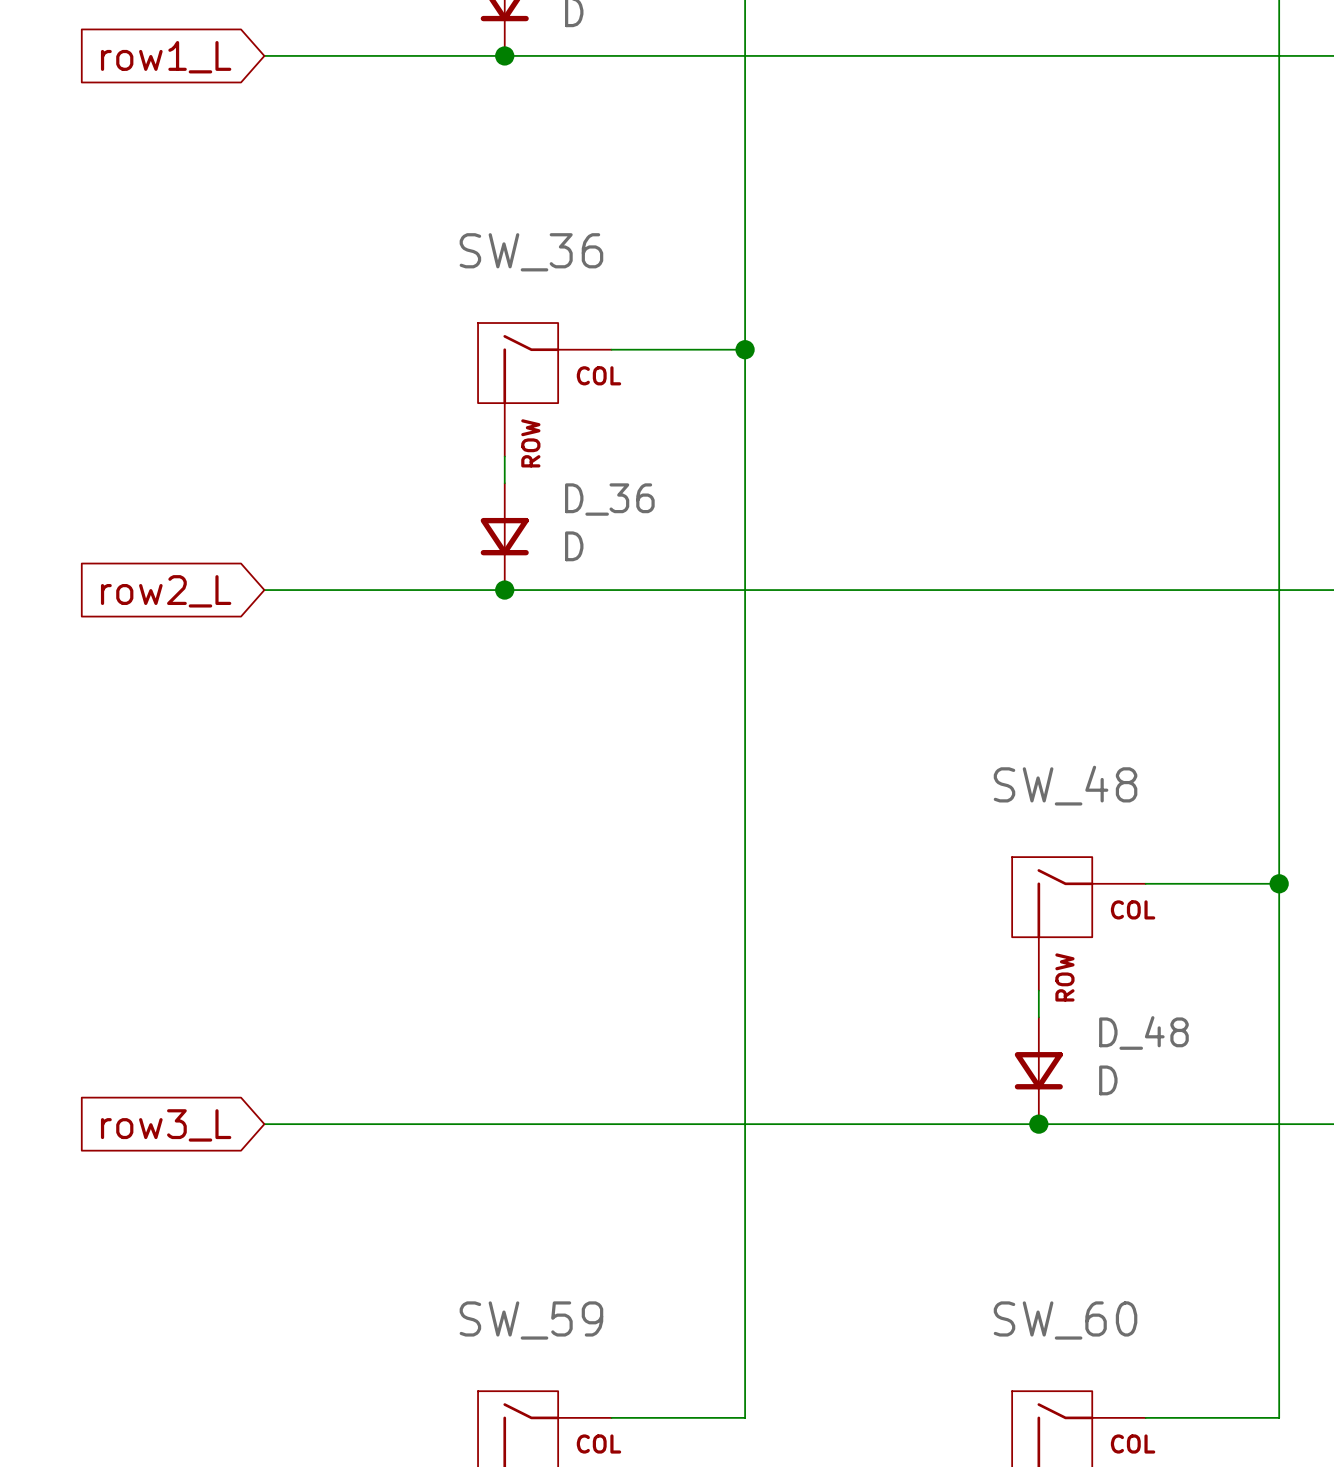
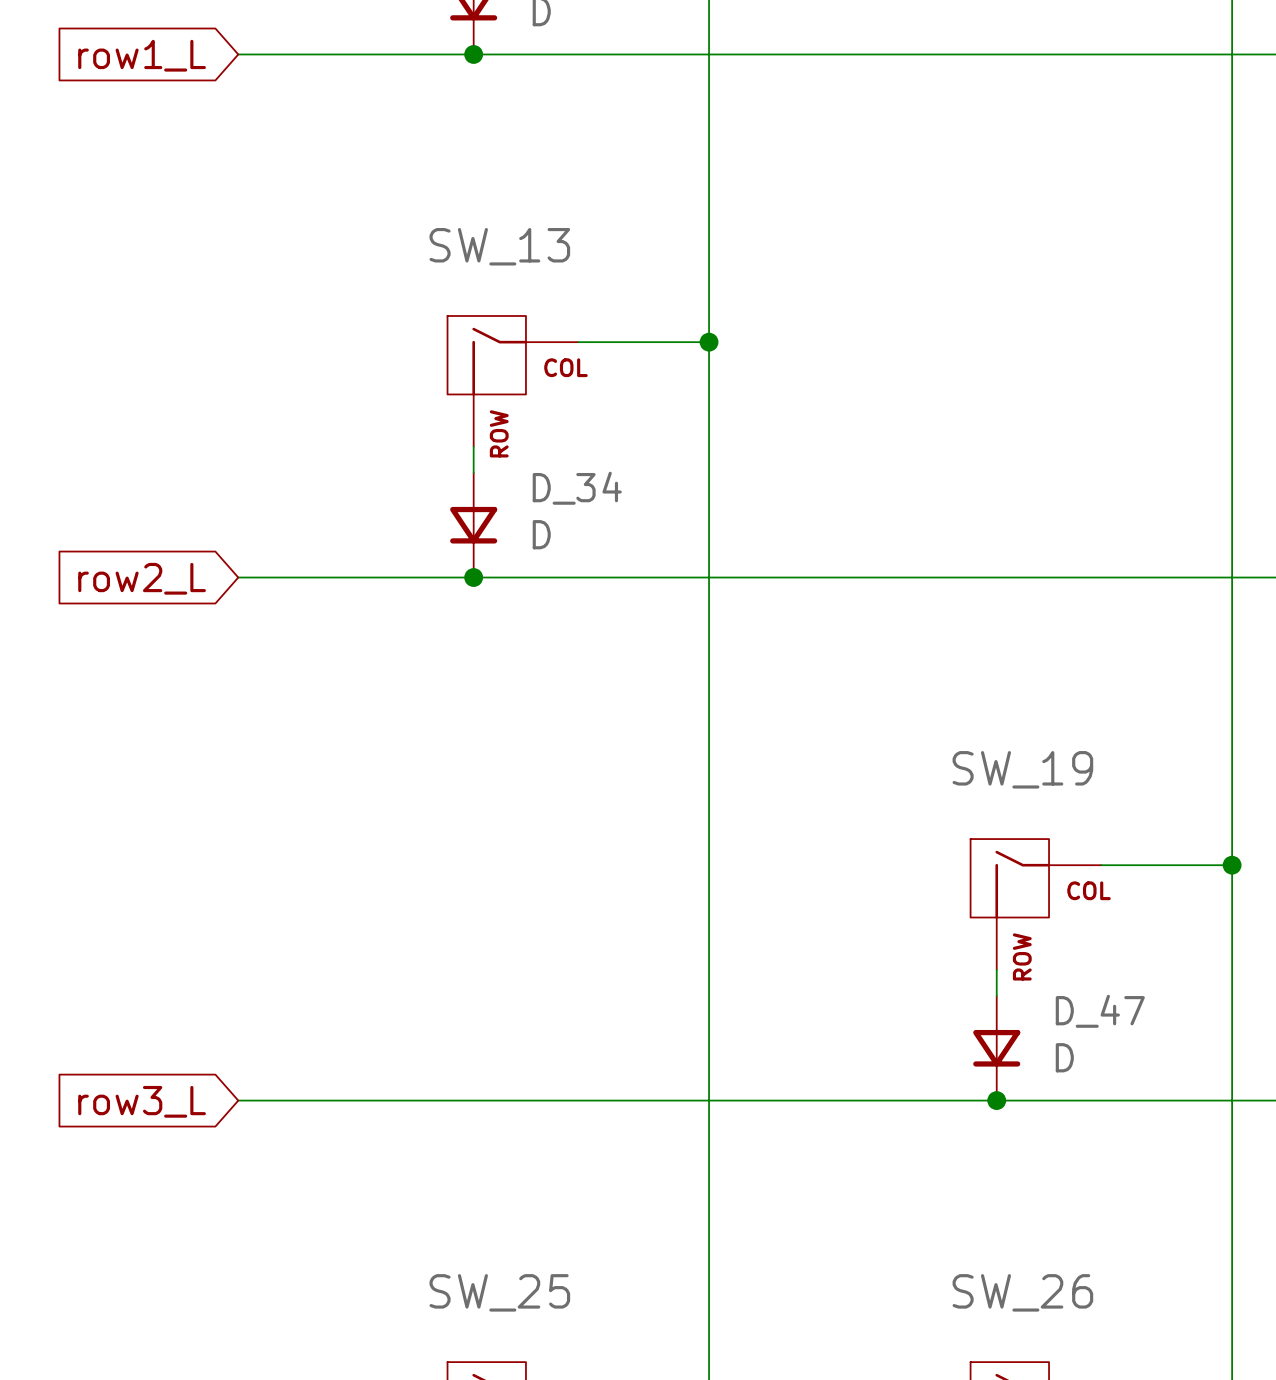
SW_36 name: SW_36 (531, 252) -> SW_13 (499, 246)
D_36 name: D_36 (609, 499) -> D_34 (577, 488)
SW_48 name: SW_48 (1065, 785) -> SW_19 (1022, 769)
D_48 name: D_48 (1143, 1032) -> D_47 (1100, 1011)
SW_59 name: SW_59 (531, 1320) -> SW_25 (499, 1292)
SW_60 name: SW_60 (1065, 1320) -> SW_26 (1022, 1292)

